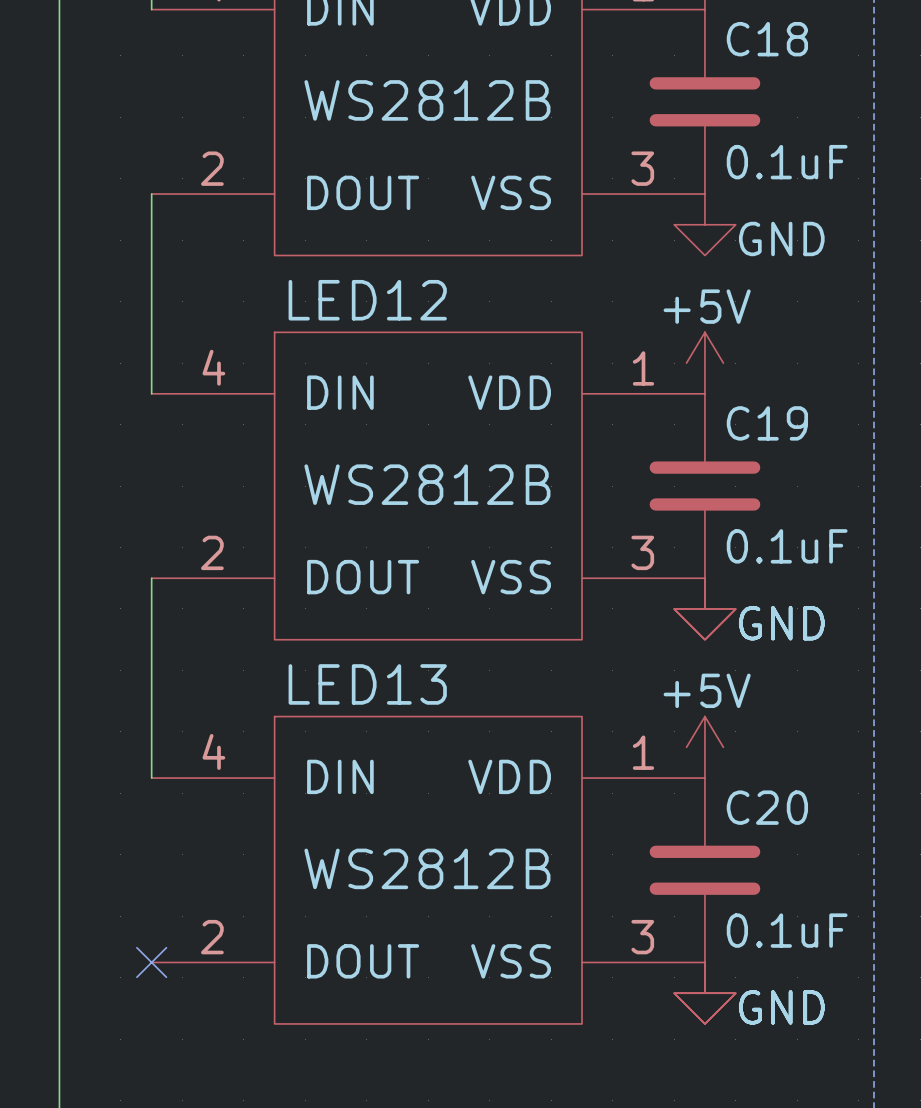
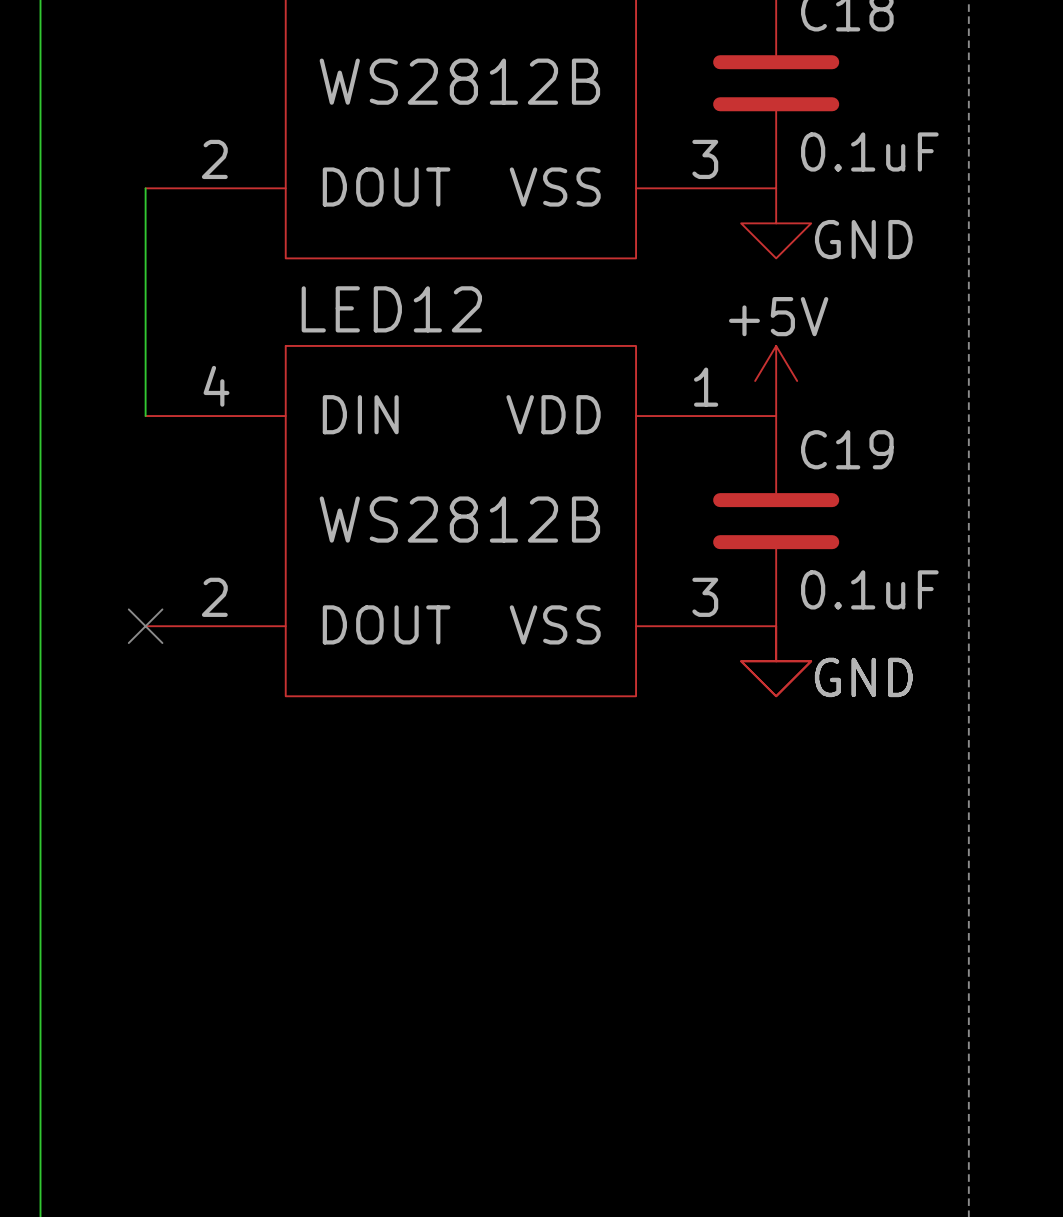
wire: (151, 578) (151, 778) -> none
no-connect mark: none -> (145, 626)
power symbol: +5V (704, 747) -> none
LED13: WS2812B (428, 870) -> none
C20: 0.1uF (704, 870) -> none
no-connect mark: (151, 962) -> none
power symbol: GND (704, 993) -> none

